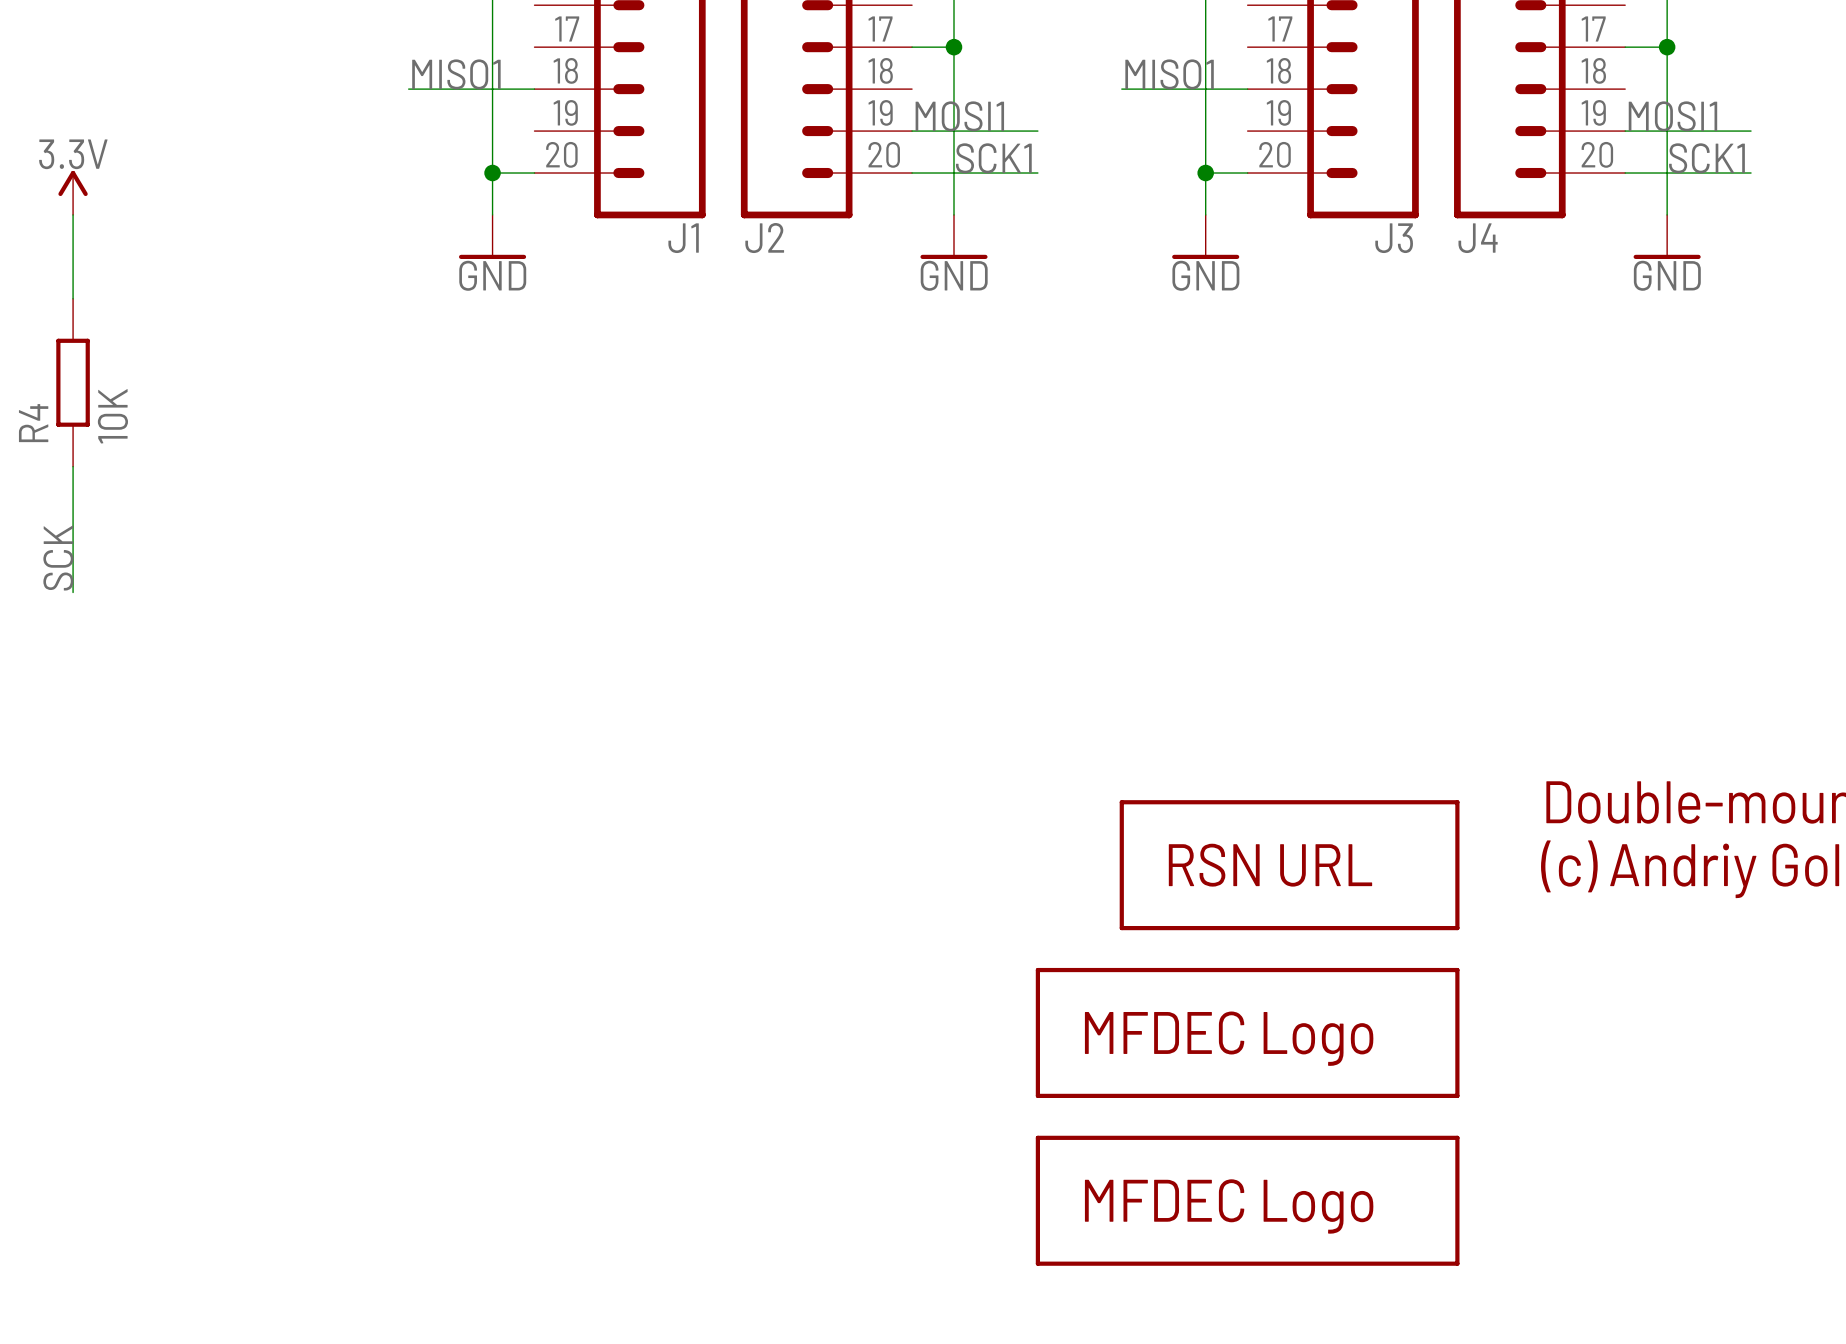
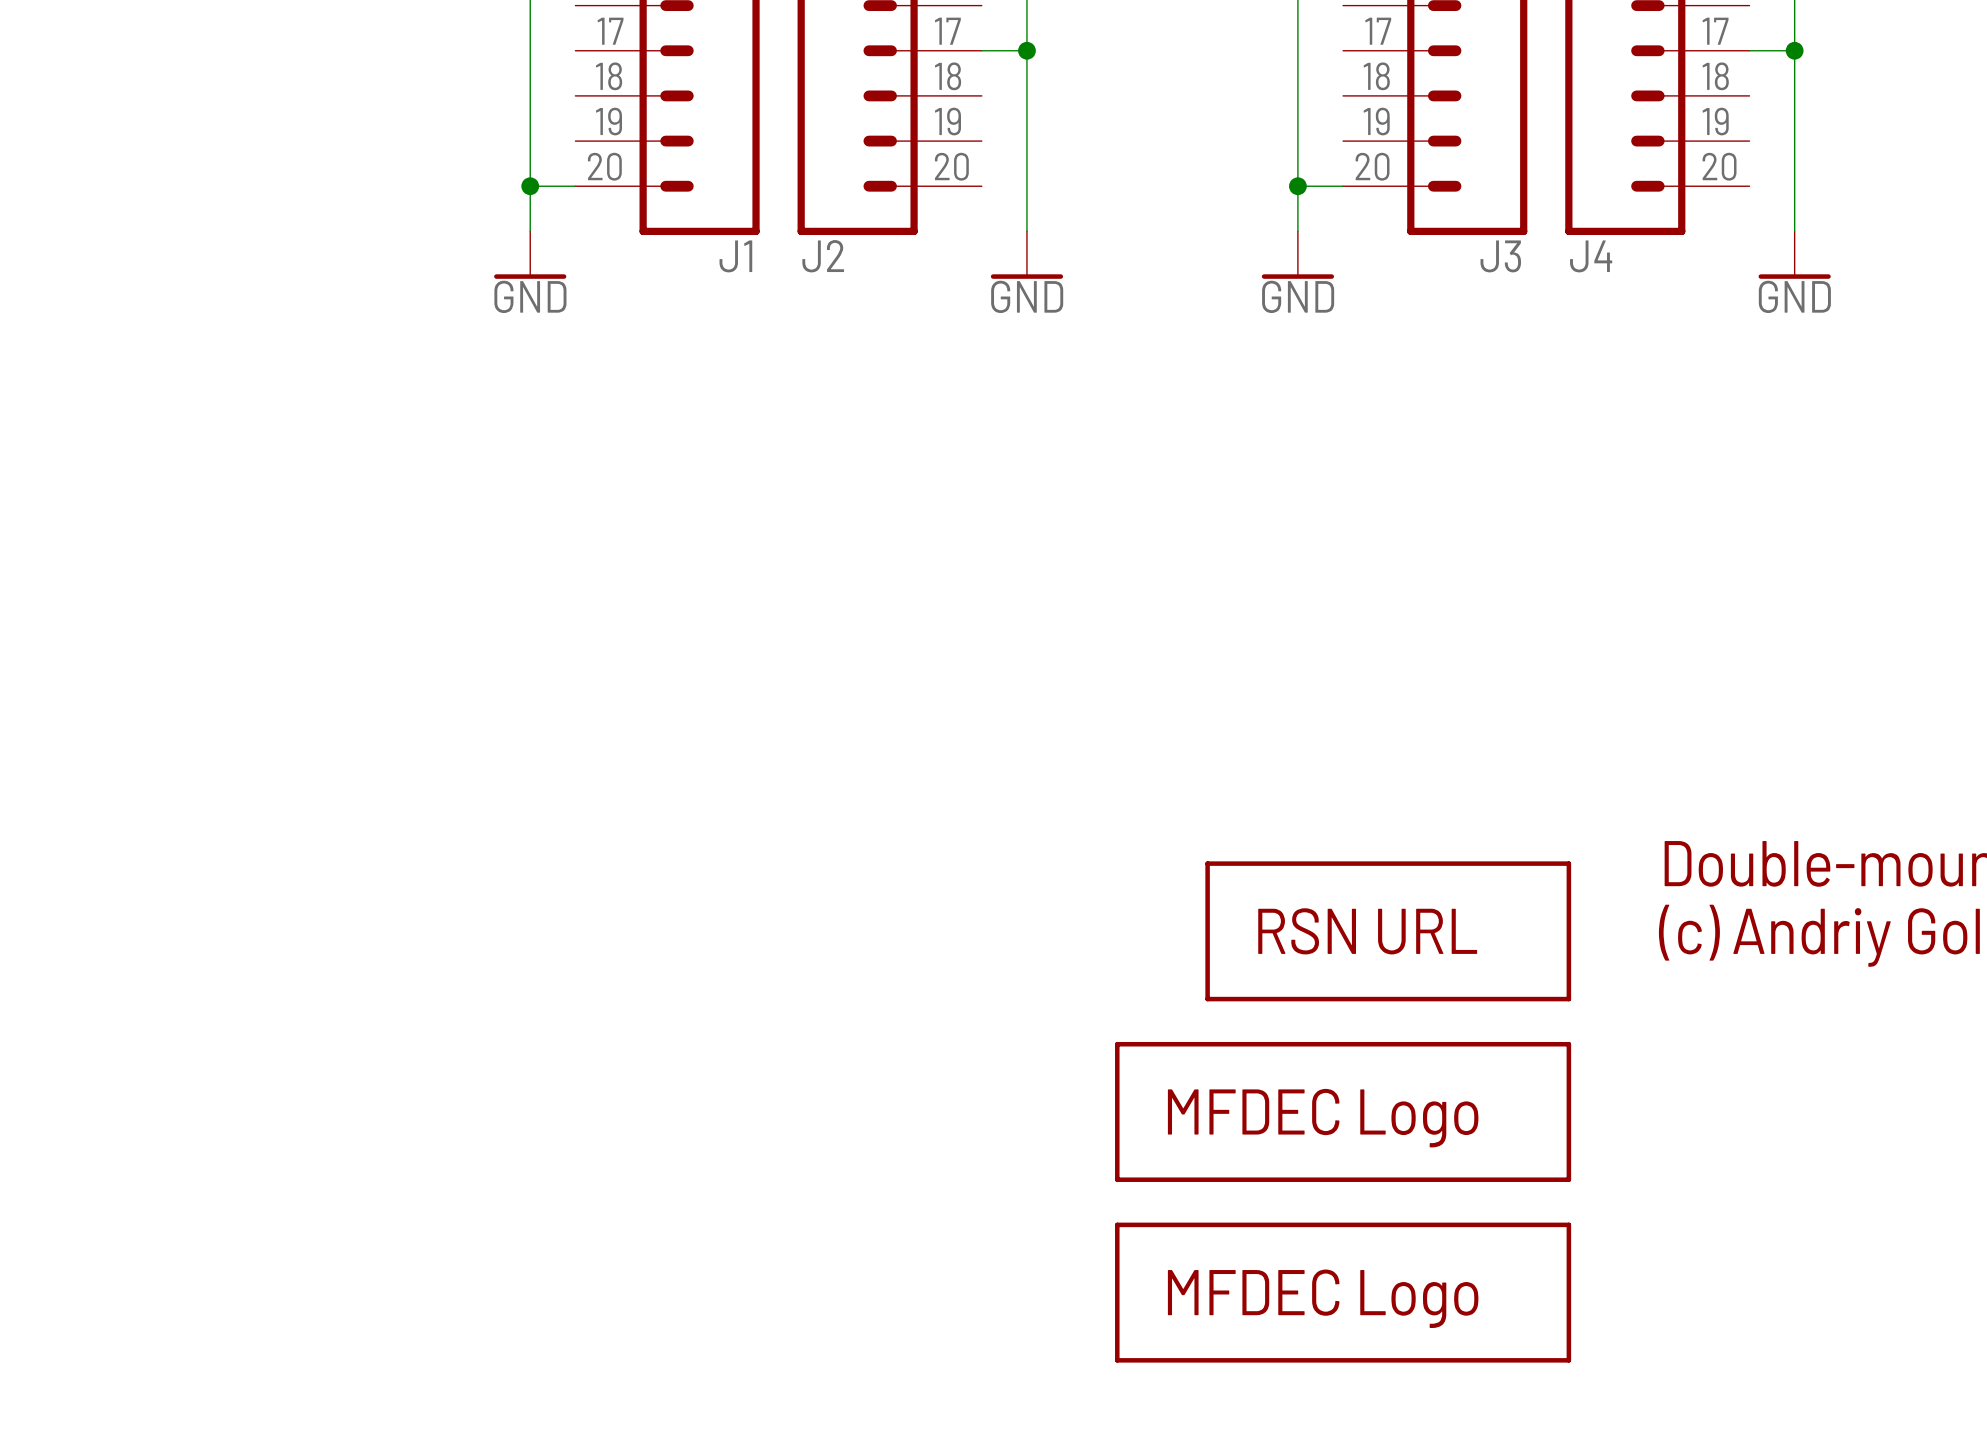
label: MISO1 (456, 74) -> none
label: MISO1 (1169, 74) -> none
wire: (408, 89) (534, 89) -> none
wire: (1121, 89) (1247, 89) -> none
label: MOSI1 (959, 116) -> none
label: MOSI1 (1672, 116) -> none
wire: (912, 131) (1037, 131) -> none
wire: (1625, 131) (1751, 131) -> none
label: SCK1 (993, 158) -> none
label: SCK1 (1706, 158) -> none
wire: (912, 173) (1037, 173) -> none
wire: (1625, 173) (1751, 173) -> none
power symbol: 3.3V (73, 192) -> none
wire: (73, 214) (73, 298) -> none
R4: 10K (73, 382) -> none
wire: (73, 466) (73, 592) -> none
label: SCK (58, 558) -> none

